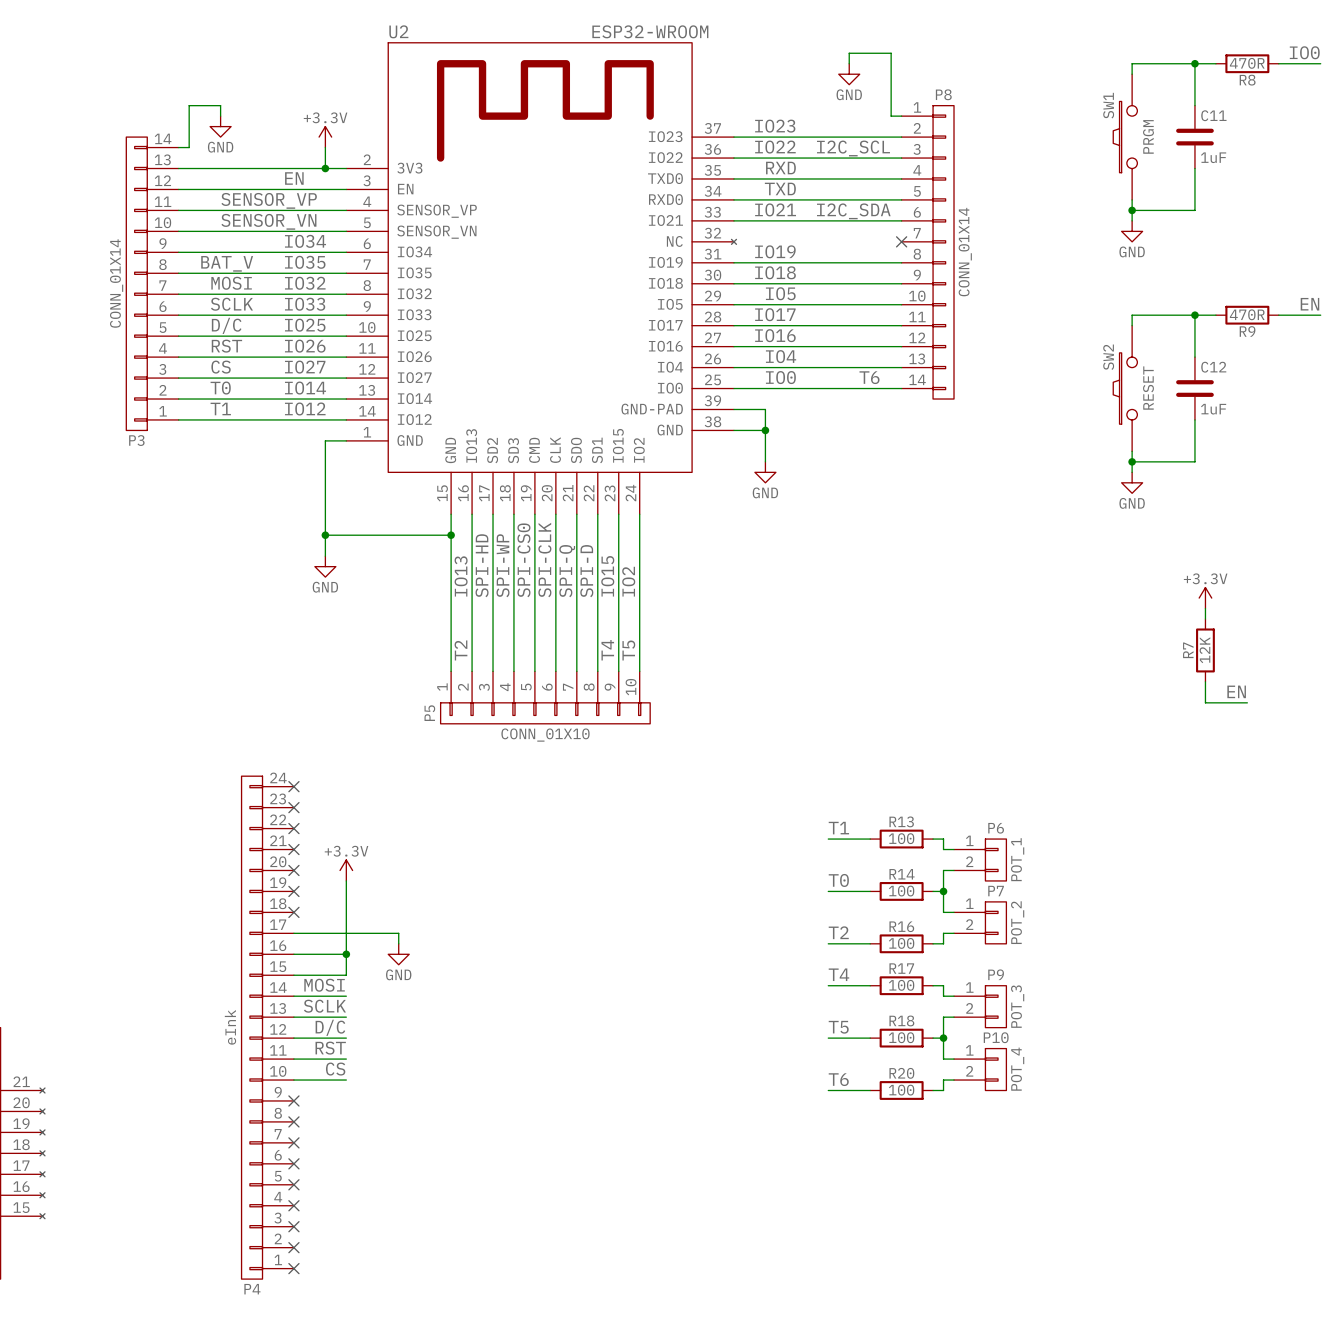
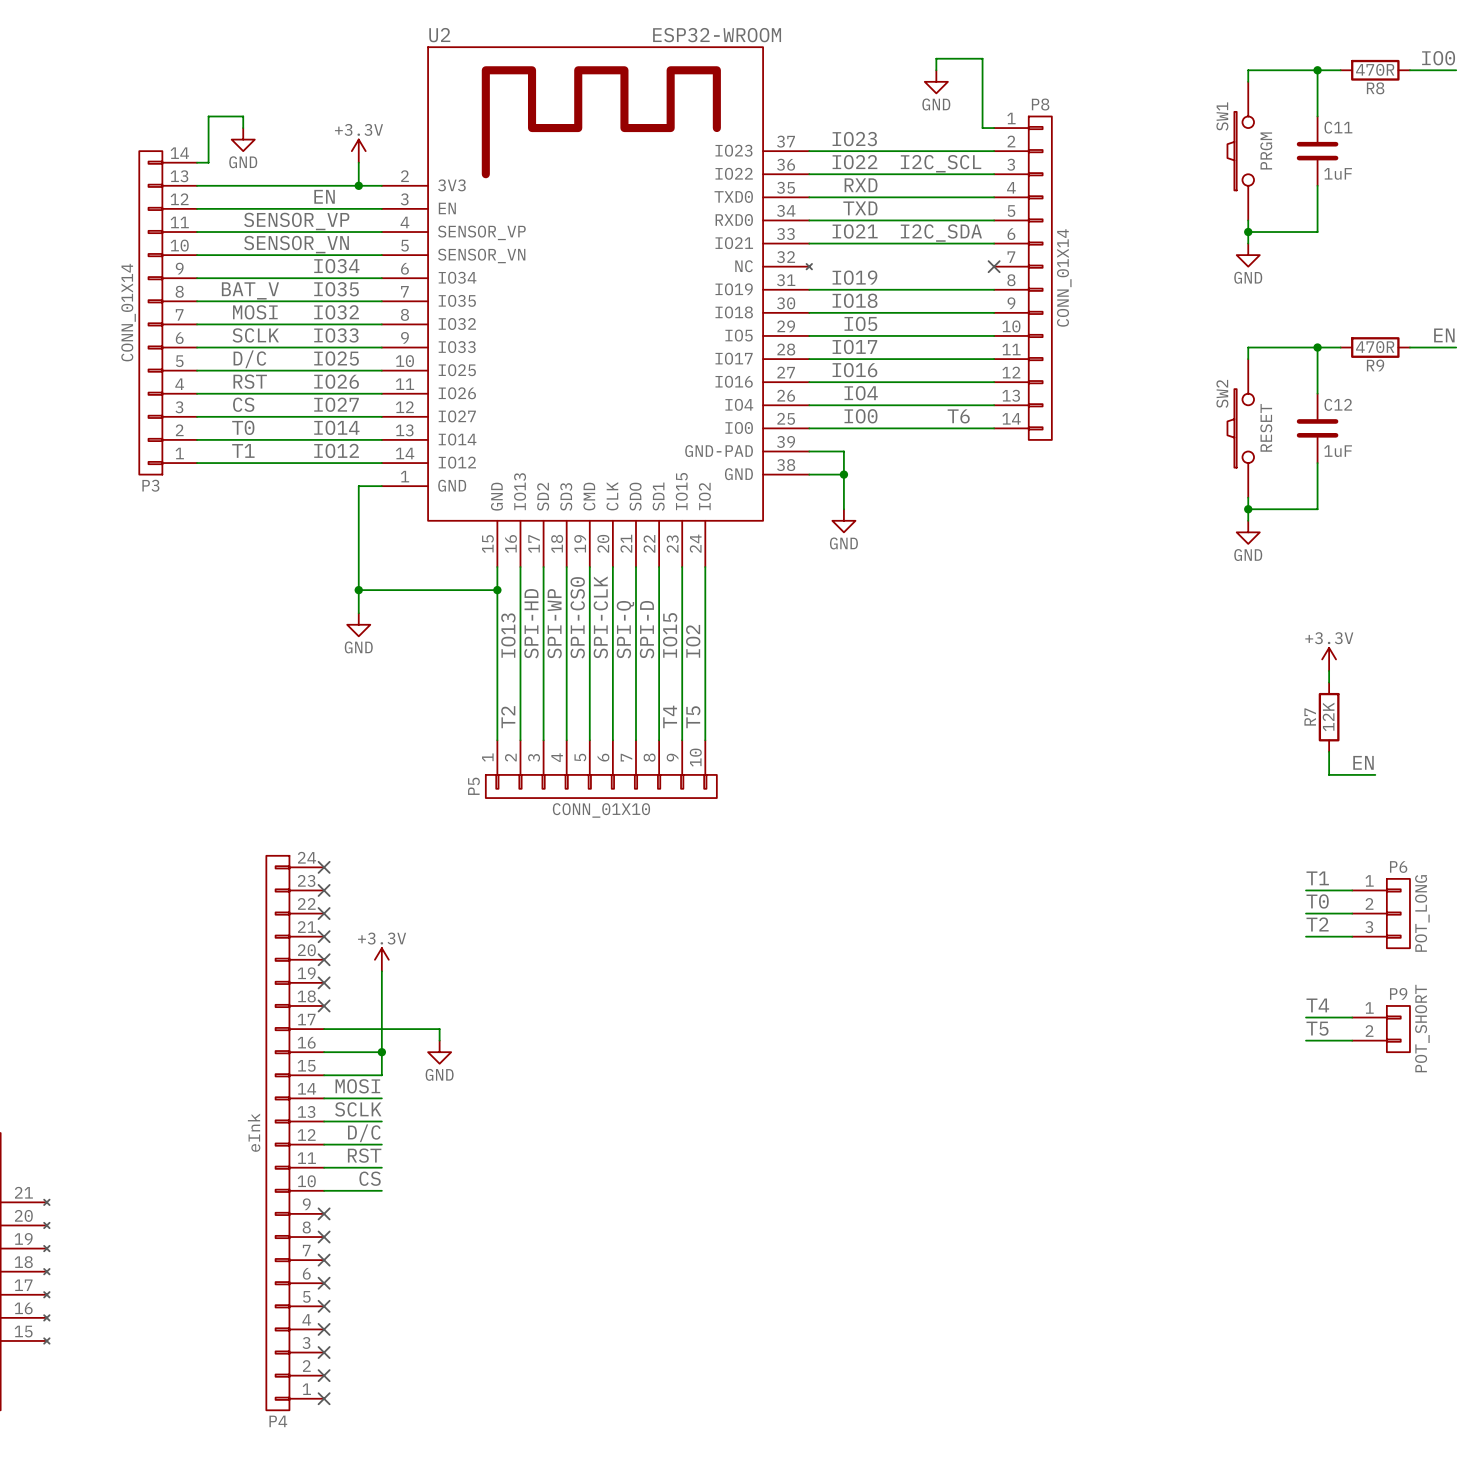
label: none -> T1 (1317, 878)
wire: none -> (1306, 890) (1352, 890)
label: none -> T0 (1317, 901)
label: T1 (838, 828) -> none
wire: none -> (1306, 913) (1352, 913)
label: none -> T2 (1317, 924)
wire: (828, 839) (870, 839) -> none
R13: 100 (901, 839) -> none
wire: (933, 839) (943, 839) (943, 849) (954, 849) -> none
P6 symbol: [954, 839, 1007, 881] -> [1352, 878, 1410, 949]
wire: none -> (1306, 936) (1352, 936)
P6 value: POT_1 (1017, 859) -> POT_LONG (1422, 913)
wire: (954, 870) (943, 870) (943, 912) (954, 912) -> none
label: T0 (838, 880) -> none
wire: (828, 891) (870, 891) -> none
R14: 100 (901, 891) -> none
wire: (933, 891) (943, 891) -> none
junction: (943, 891) -> none
label: none -> T4 (1317, 1005)
P7: POT_2 (980, 922) -> none
wire: none -> (1306, 1017) (1352, 1017)
label: T2 (838, 932) -> none
label: none -> T5 (1317, 1028)
wire: (954, 933) (943, 933) (943, 943) (933, 943) -> none
wire: (828, 943) (870, 943) -> none
R16: 100 (901, 943) -> none
wire: none -> (1306, 1040) (1352, 1040)
label: T4 (838, 974) -> none
wire: (828, 985) (870, 985) -> none
R17: 100 (901, 985) -> none
wire: (933, 985) (943, 985) (943, 996) (954, 996) -> none
P9 position: (980, 1006) -> (1381, 1029)
P9 value: POT_3 (1017, 1006) -> POT_SHORT (1422, 1028)
wire: (954, 1017) (943, 1017) (943, 1059) (954, 1059) -> none
label: T5 (838, 1027) -> none
wire: (828, 1038) (870, 1038) -> none
R18: 100 (901, 1038) -> none
wire: (933, 1038) (943, 1038) -> none
junction: (943, 1038) -> none
P10: POT_4 (980, 1069) -> none
label: T6 (838, 1079) -> none
wire: (954, 1080) (943, 1080) (943, 1090) (933, 1090) -> none
wire: (828, 1090) (870, 1090) -> none
R20: 100 (901, 1090) -> none

